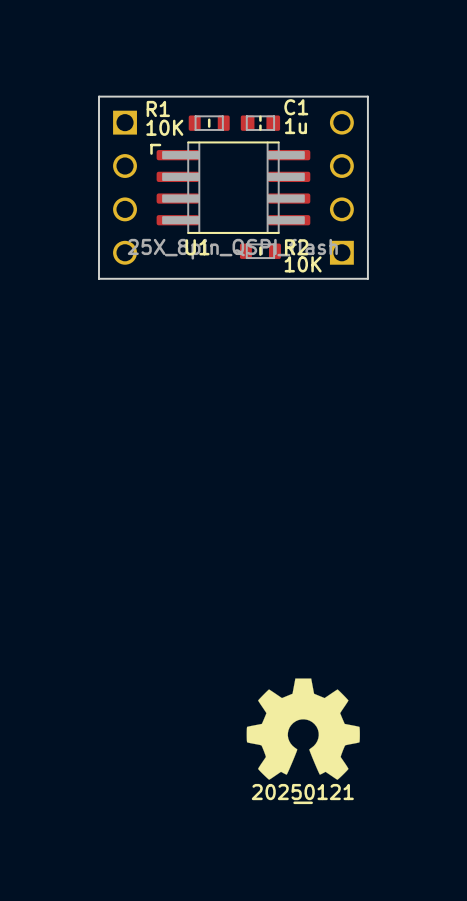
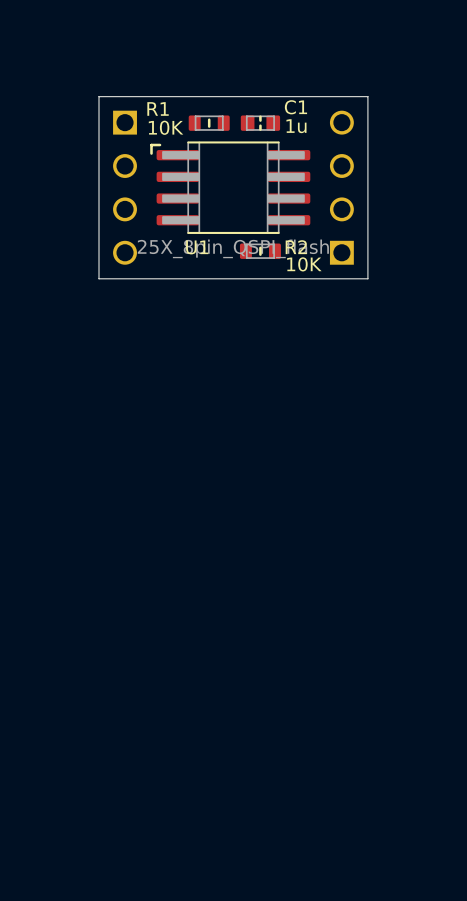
drawing: [246, 678, 360, 805] -> none

